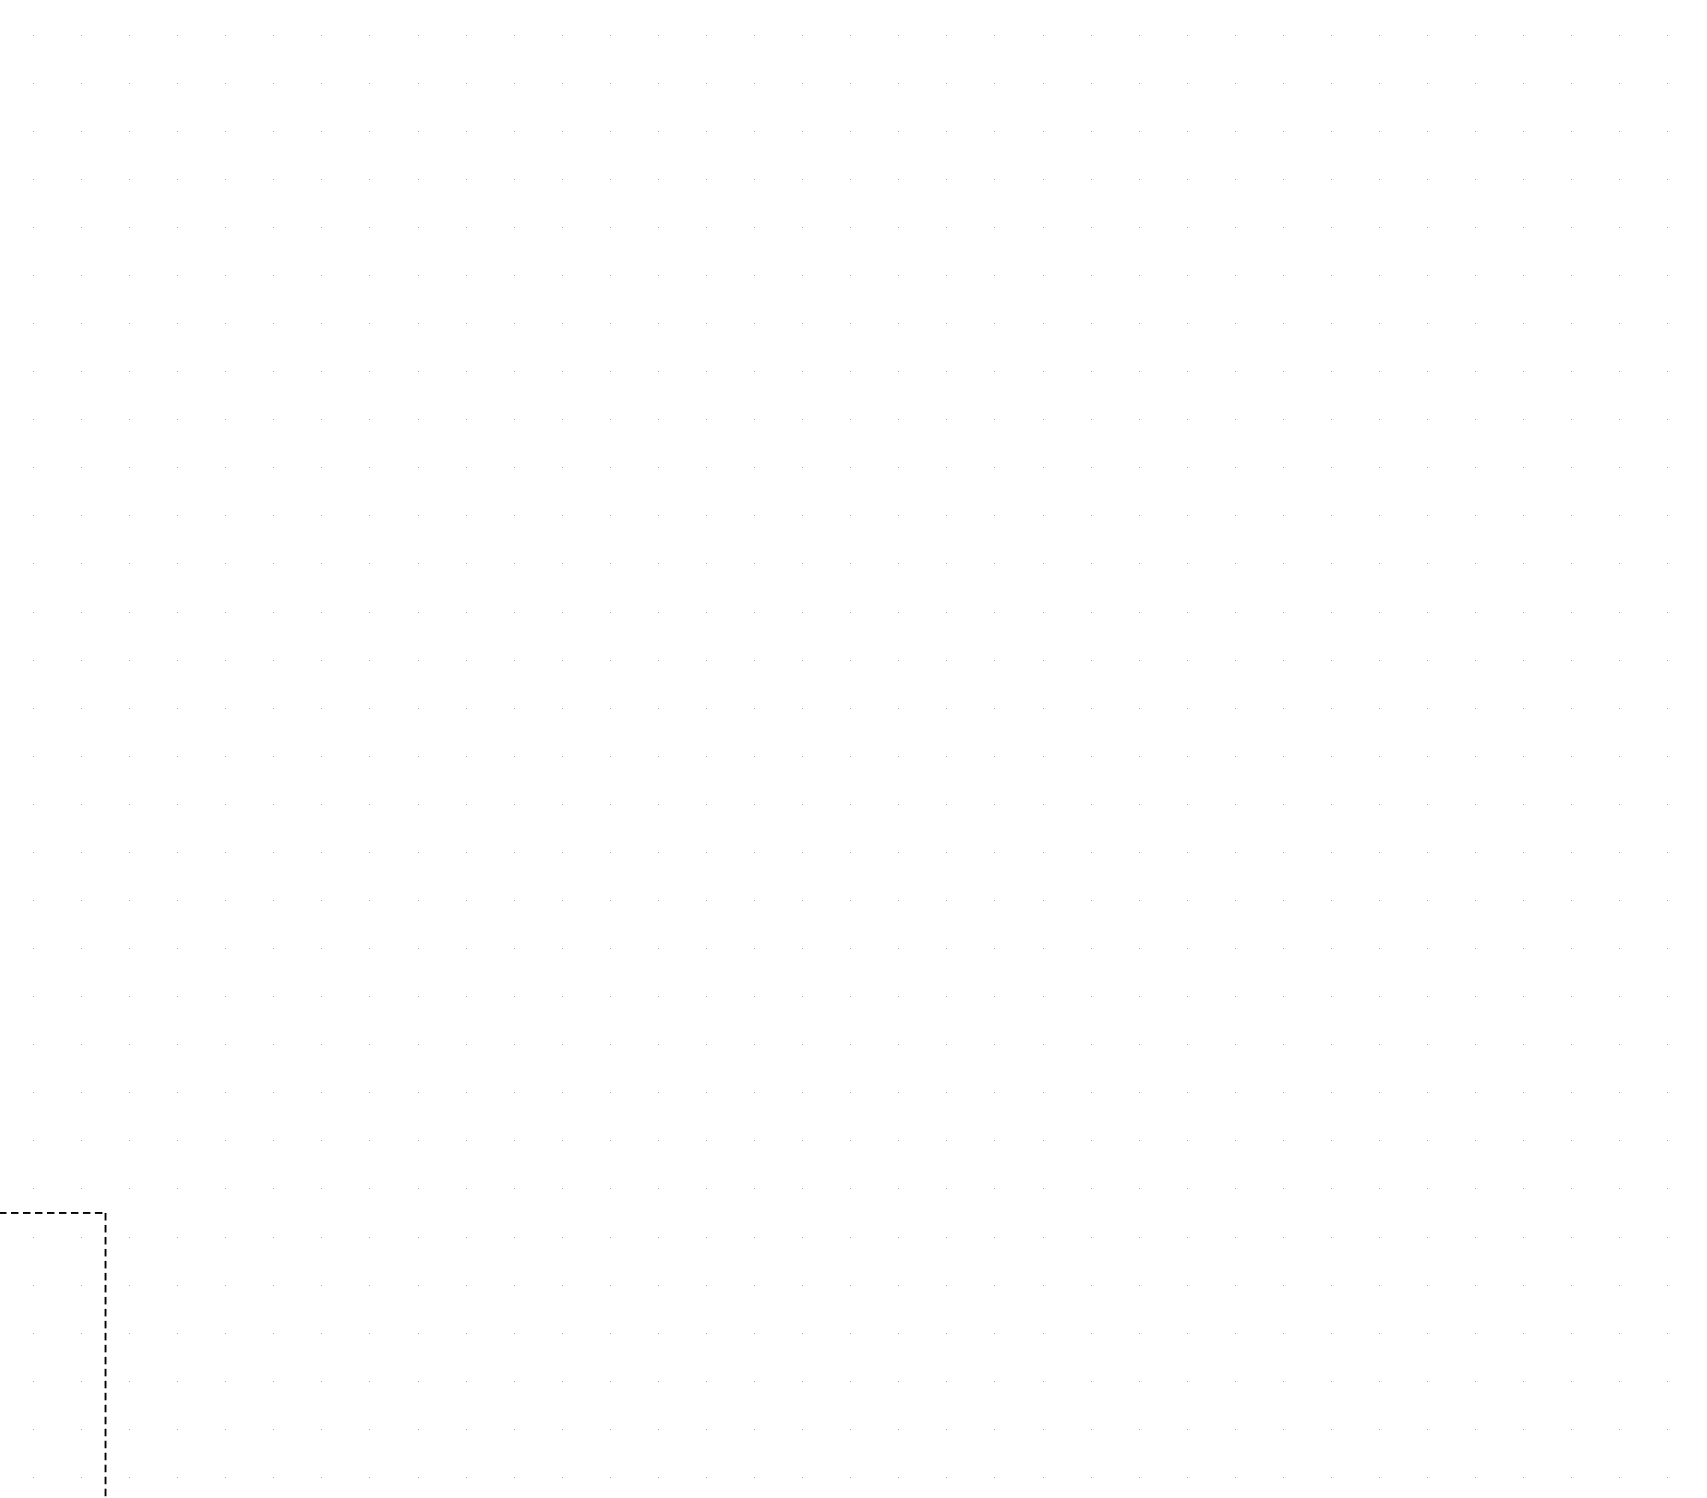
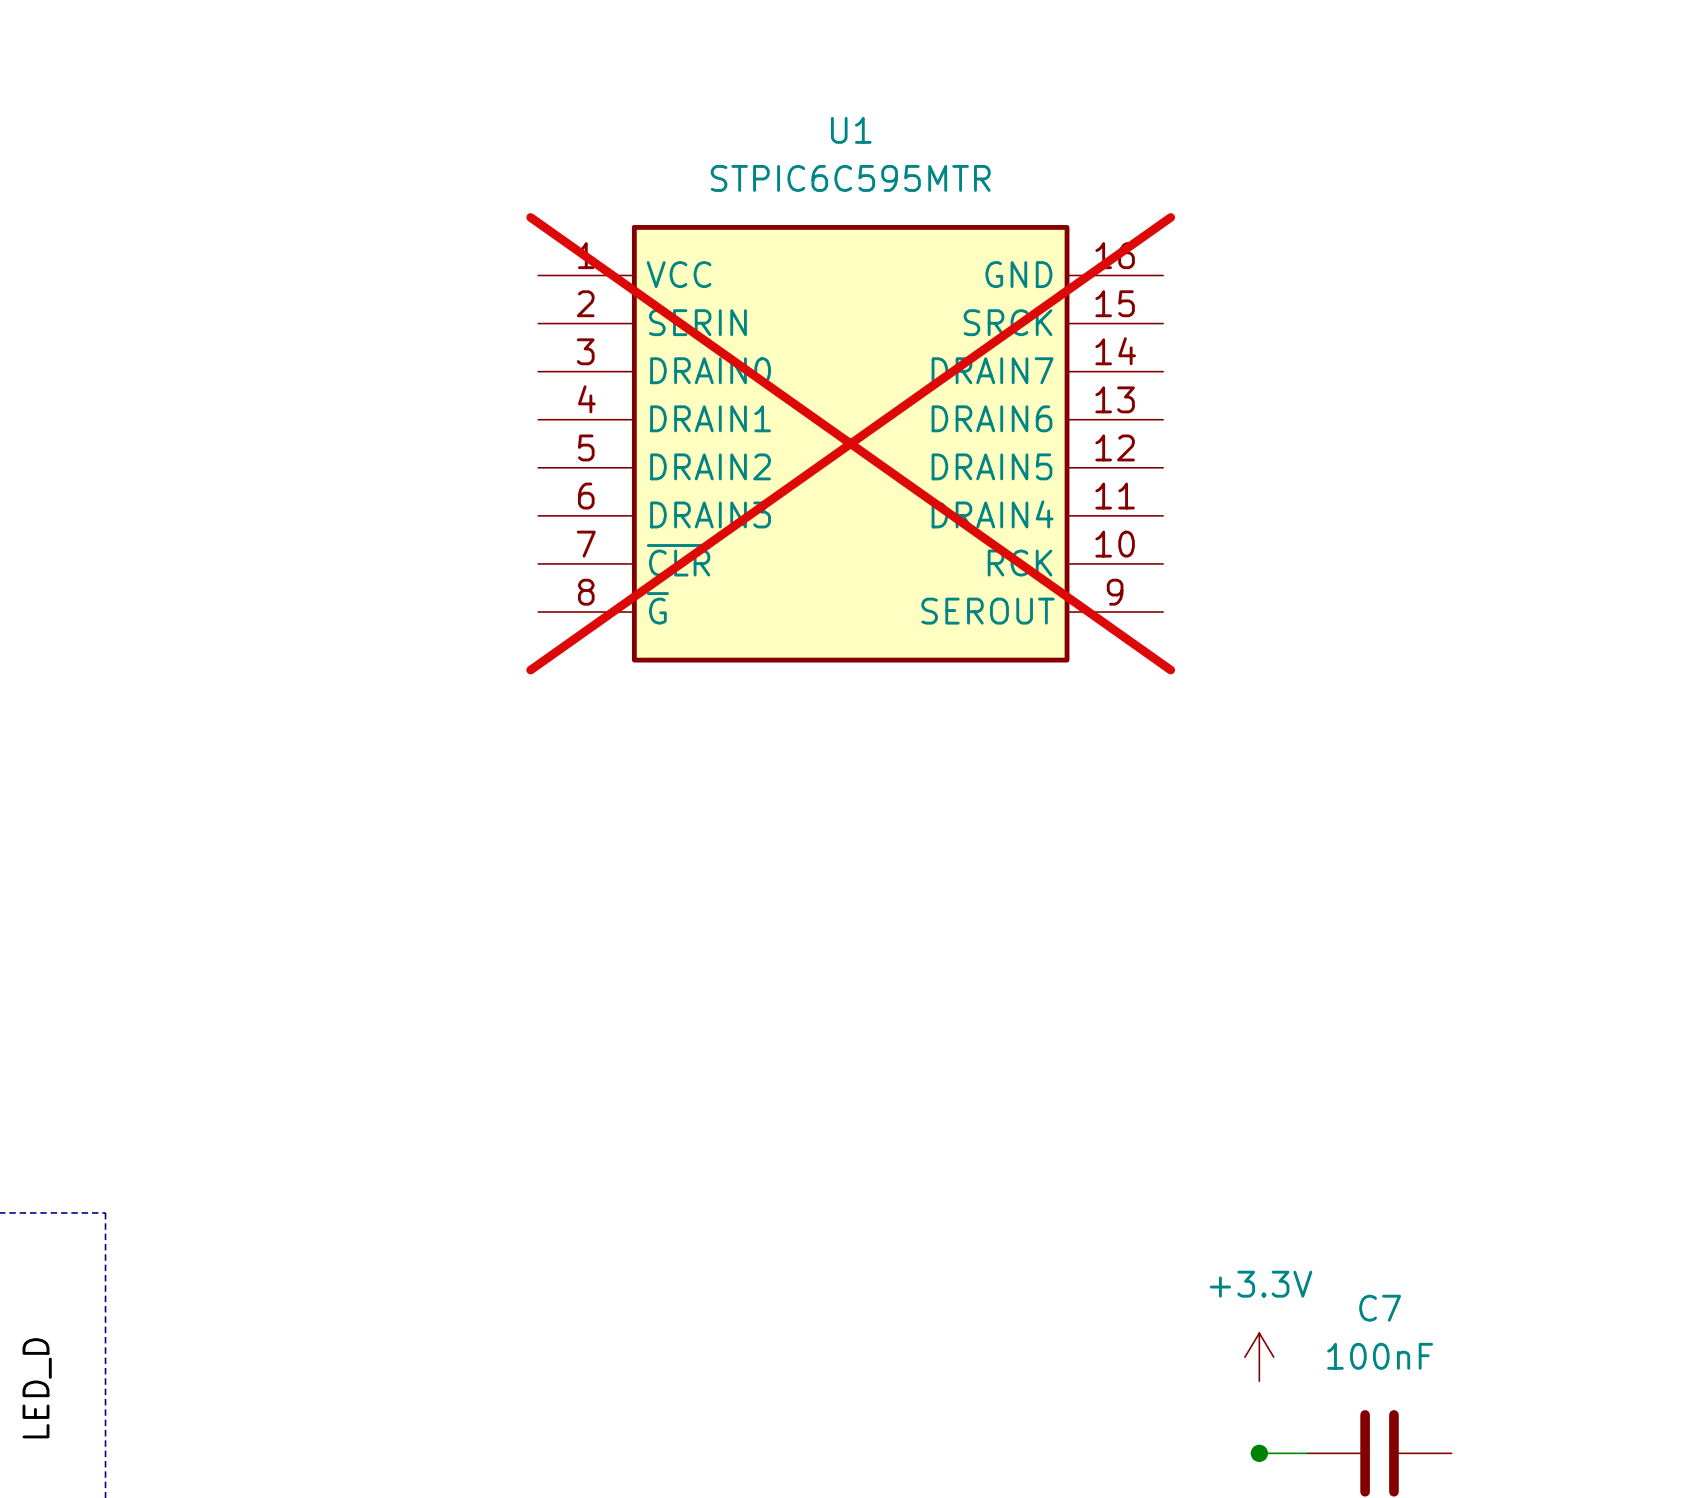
U1: none -> STPIC6C595MTR (850, 443)
power symbol: none -> +3.3V (1259, 1357)
label: none -> LED_D (37, 1388)
wire: none -> (1259, 1453) (1307, 1453)
junction: none -> (1259, 1453)
C7: none -> 100nF (1379, 1453)

